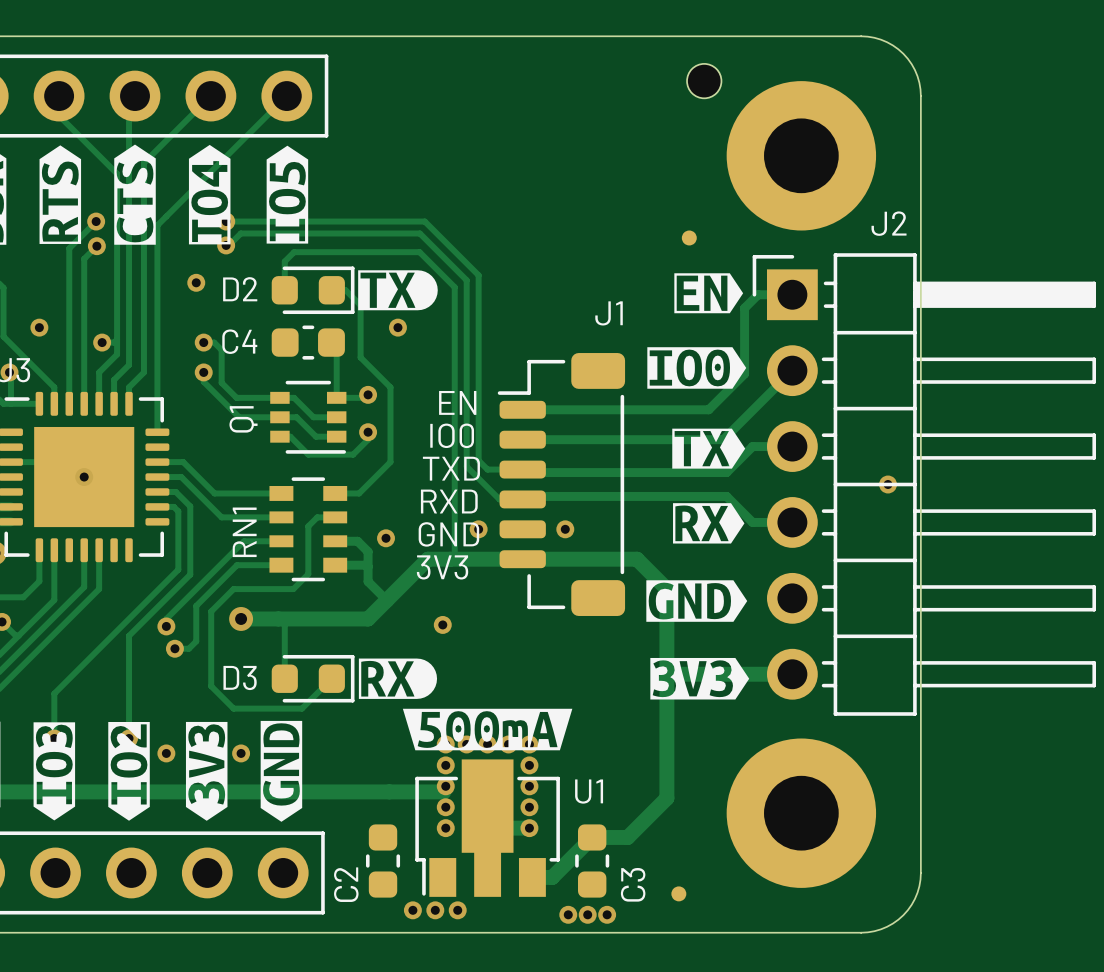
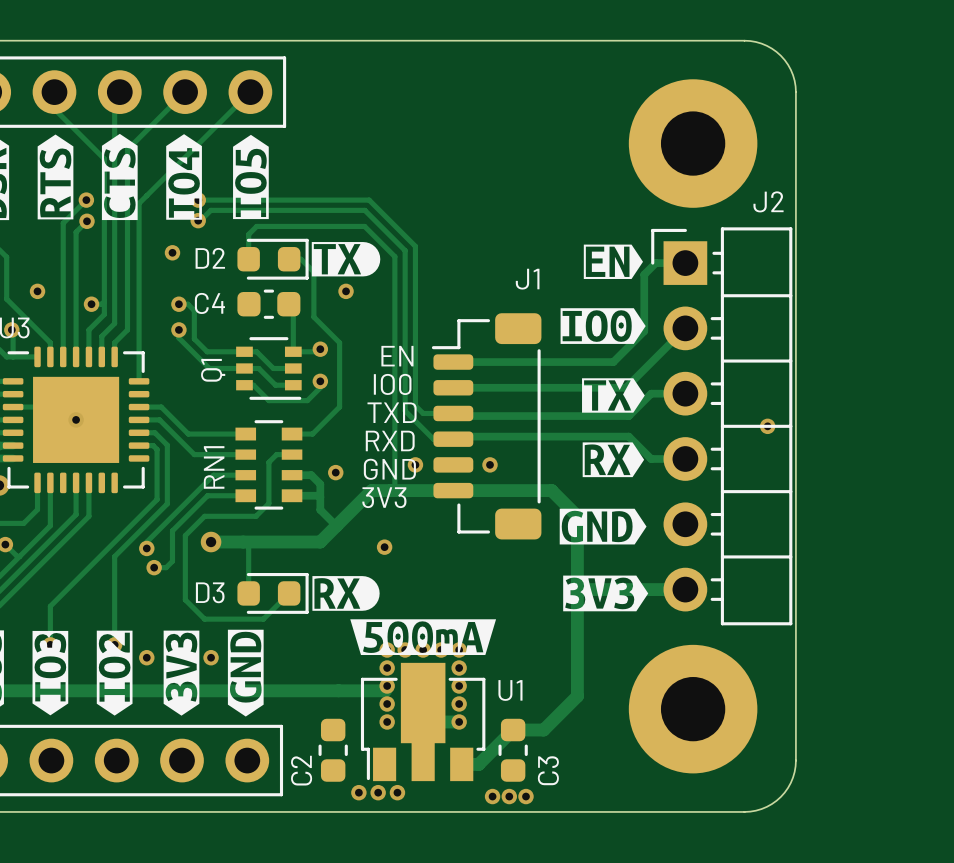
part: (704, 81) -> none
part: (689, 237) -> none
J2 footprint: [752, 253, 1097, 716] -> [651, 227, 793, 626]
part: (678, 893) -> none

